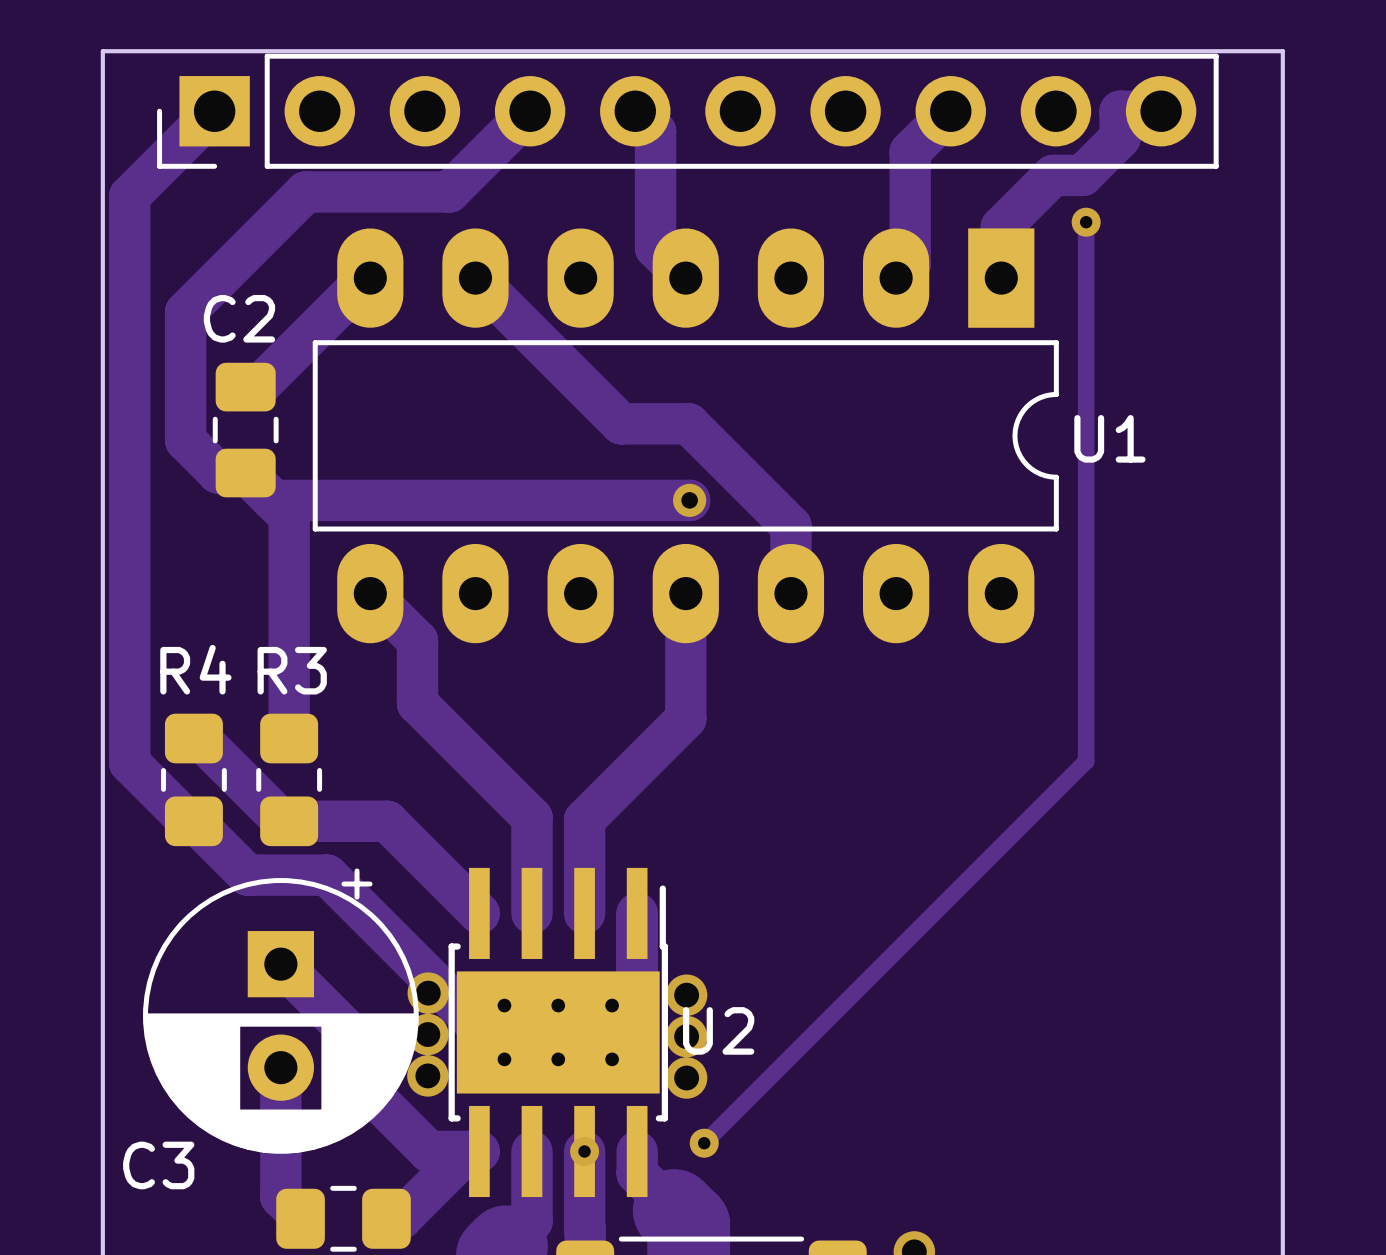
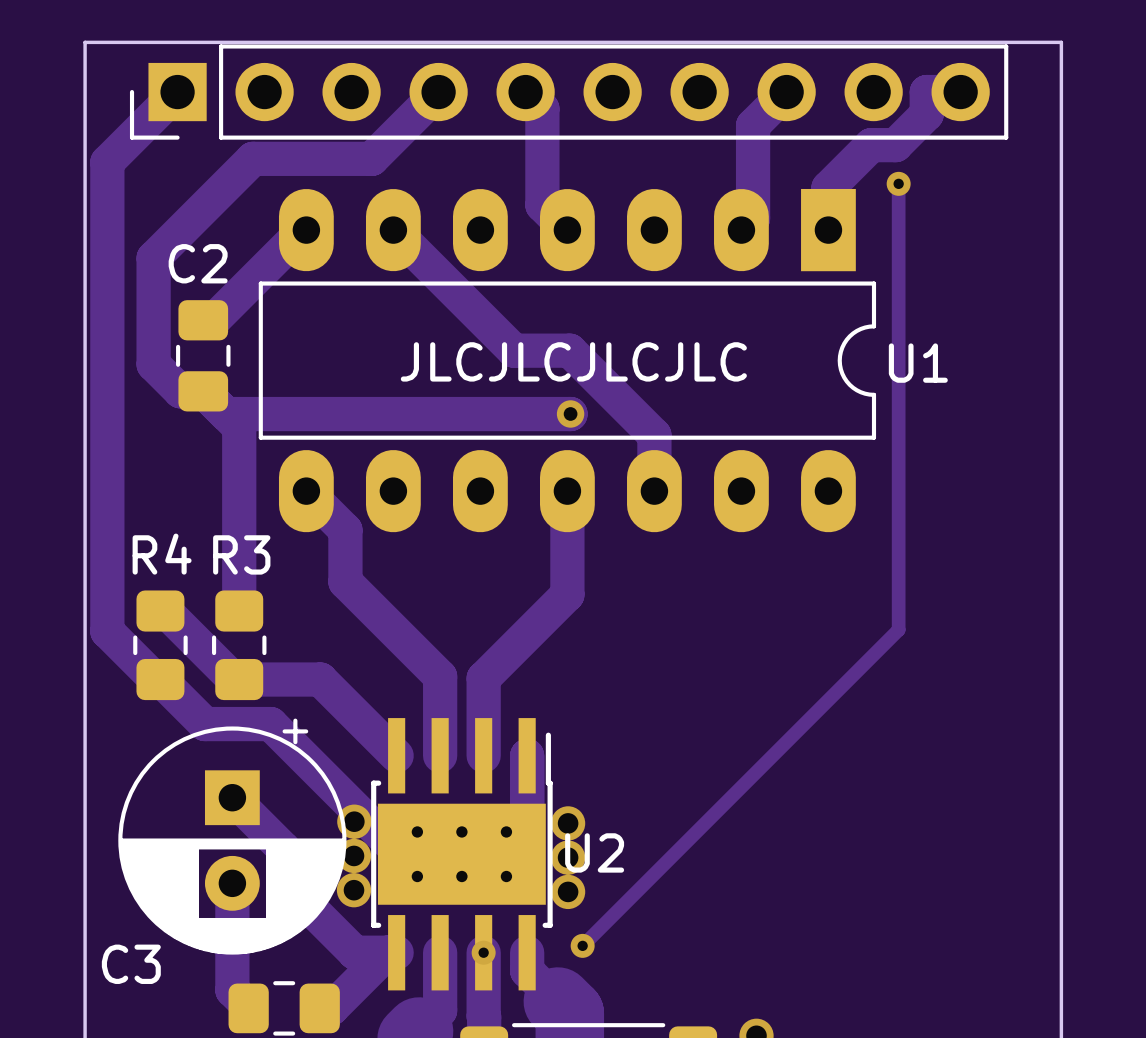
text: none -> JLCJLCJLCJLC (573, 361)

